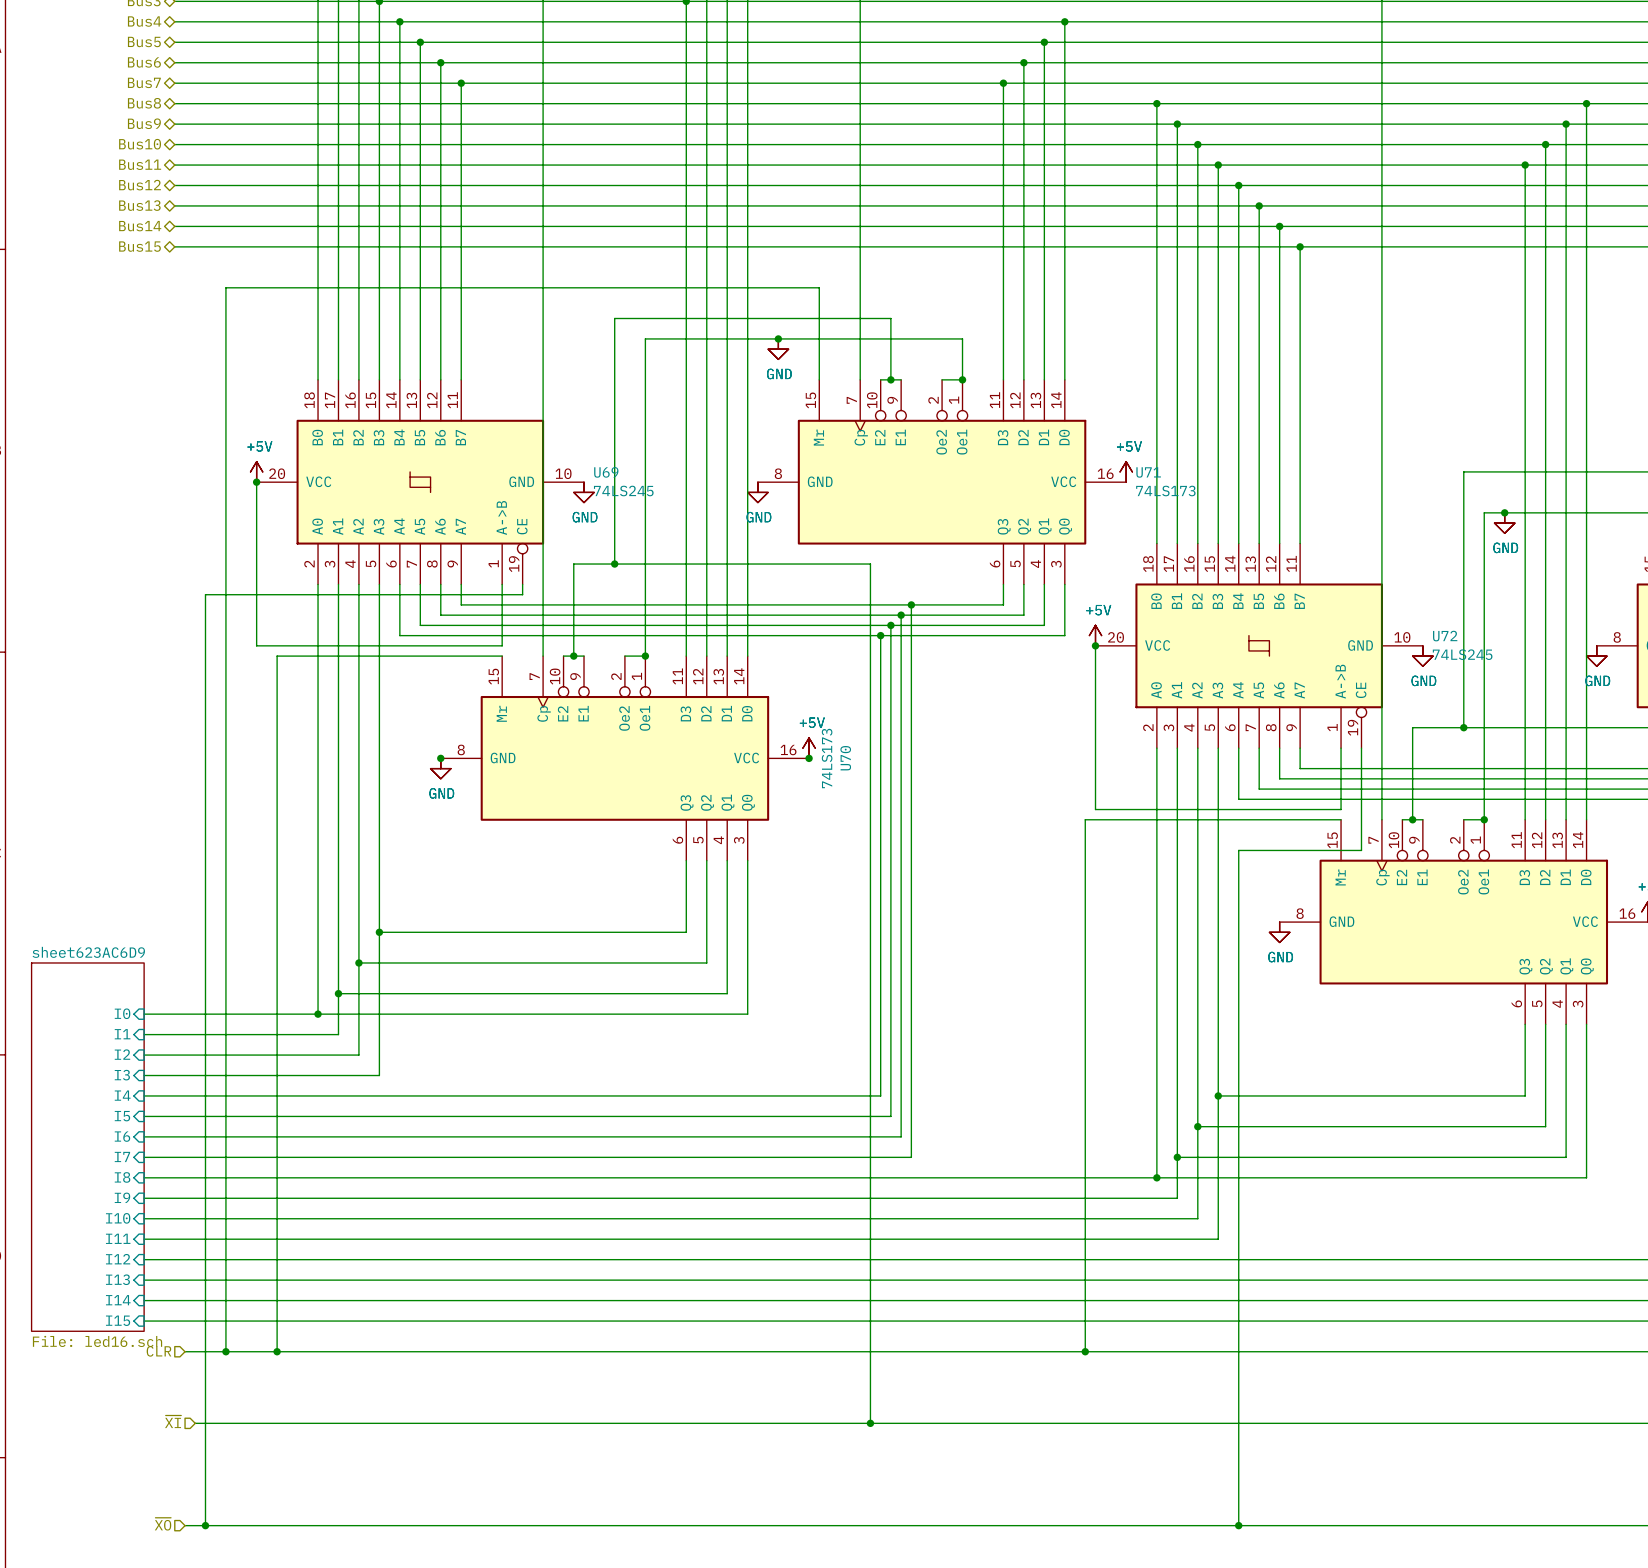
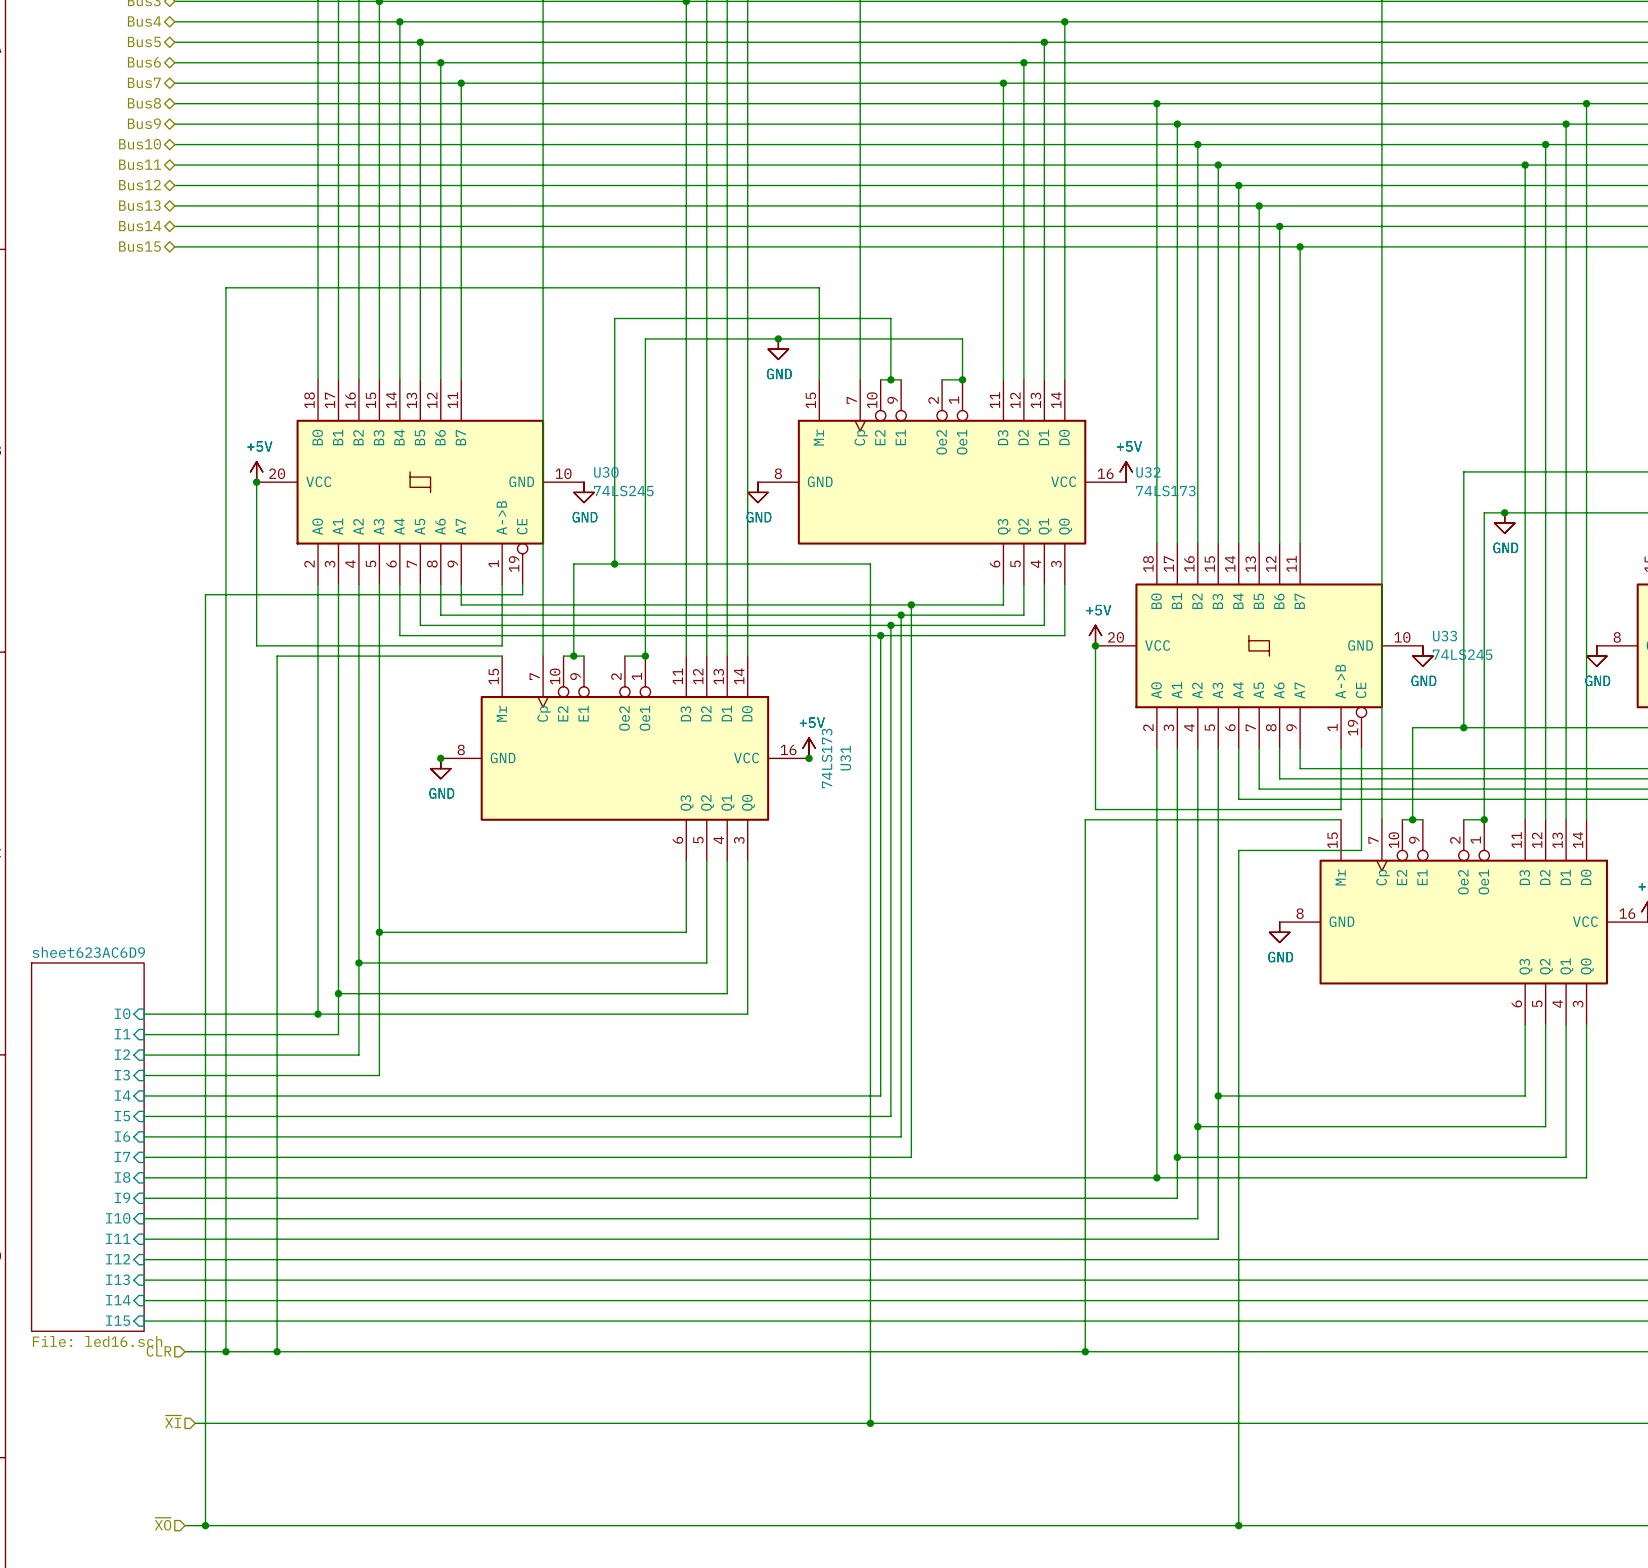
U69 name: U69 (606, 472) -> U30 (606, 472)
U71 name: U71 (1148, 472) -> U32 (1148, 472)
U72 name: U72 (1445, 636) -> U33 (1445, 636)
U70 name: U70 (845, 758) -> U31 (845, 758)

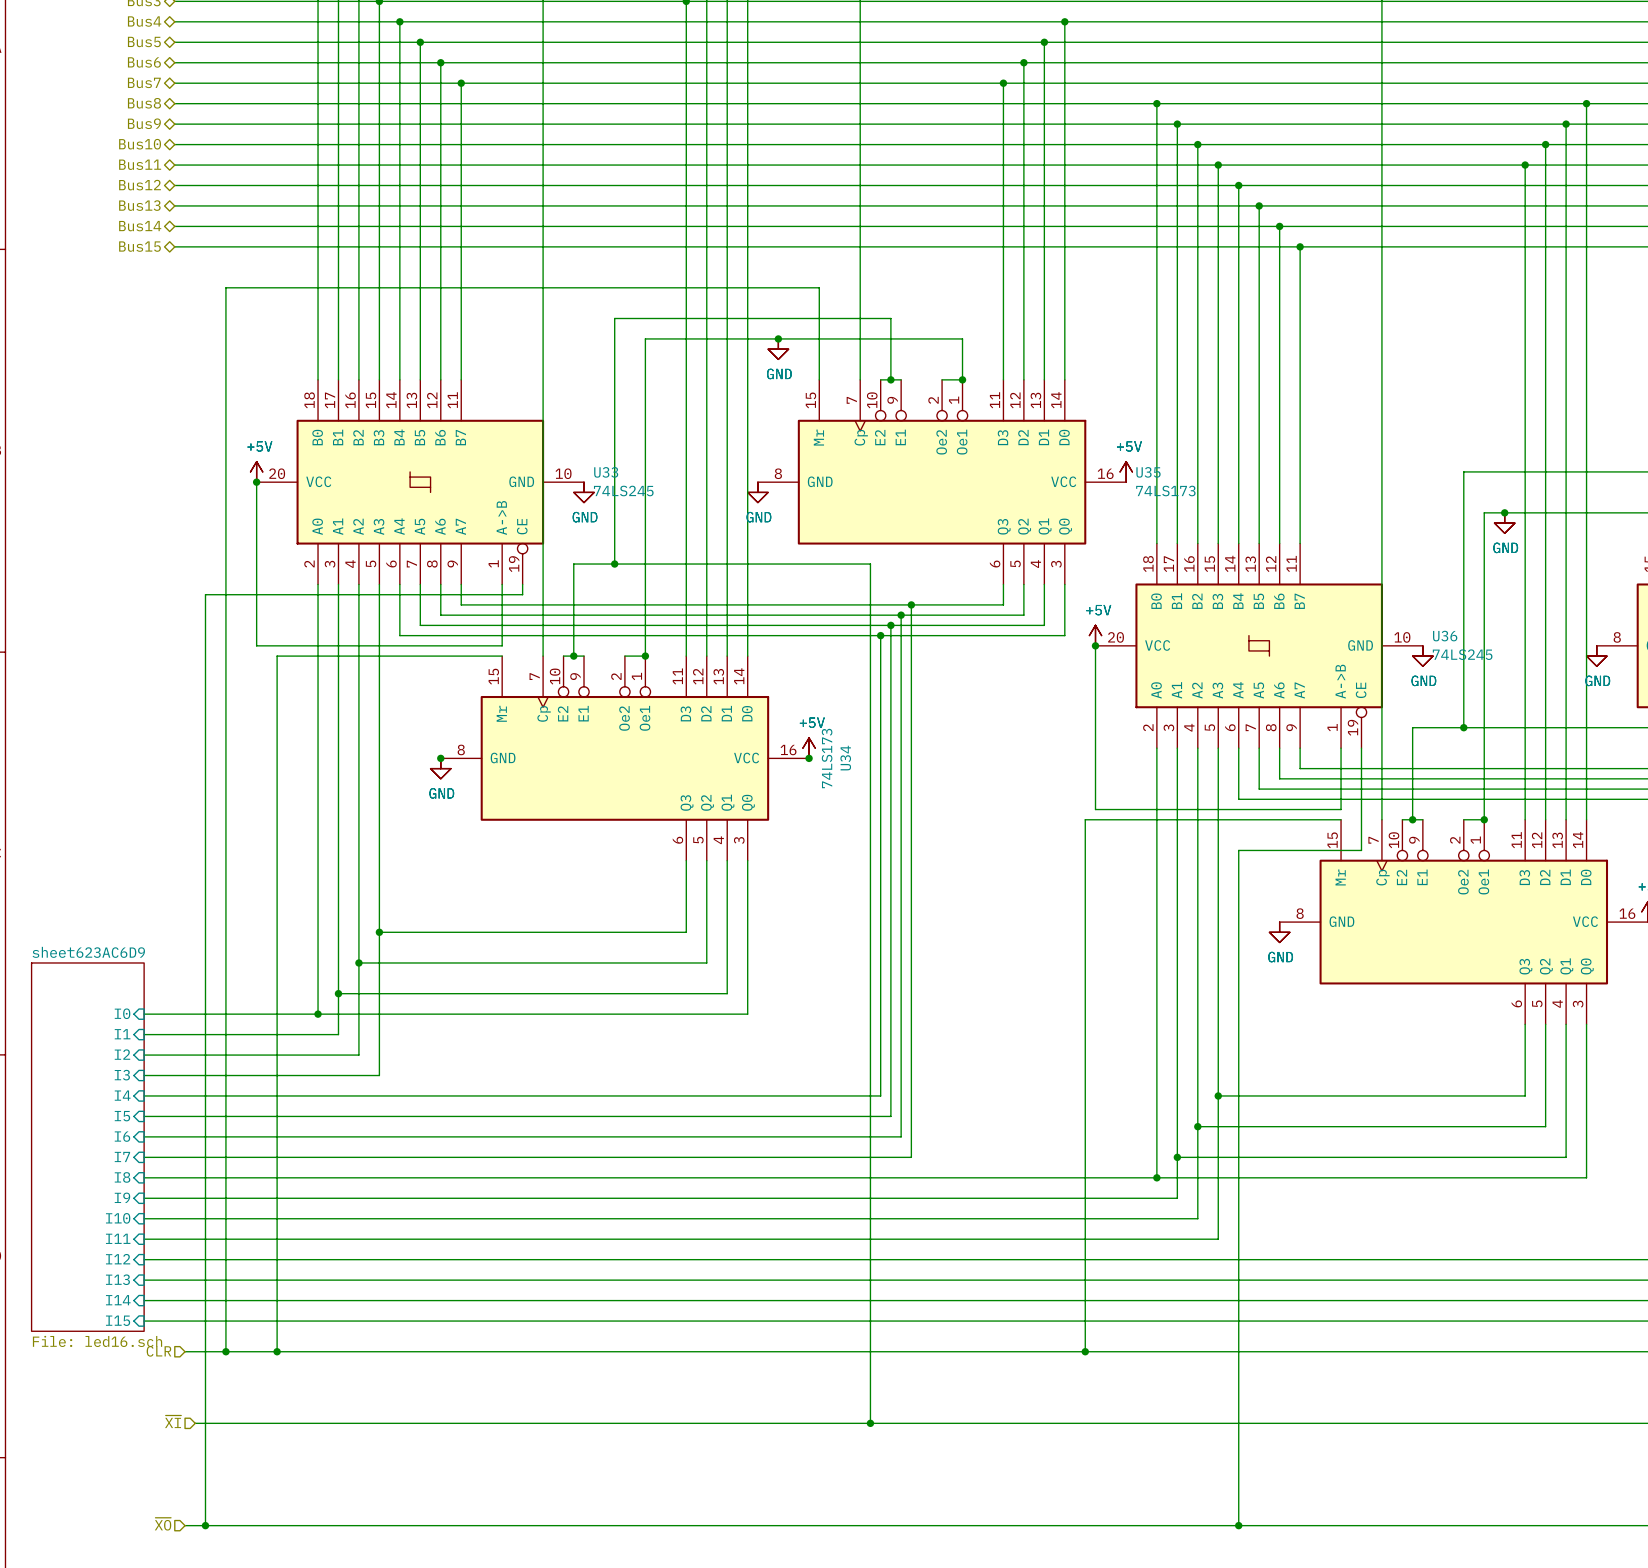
U30 name: U30 (606, 472) -> U33 (606, 472)
U32 name: U32 (1148, 472) -> U35 (1148, 472)
U33 name: U33 (1445, 636) -> U36 (1445, 636)
U31 name: U31 (845, 758) -> U34 (845, 758)

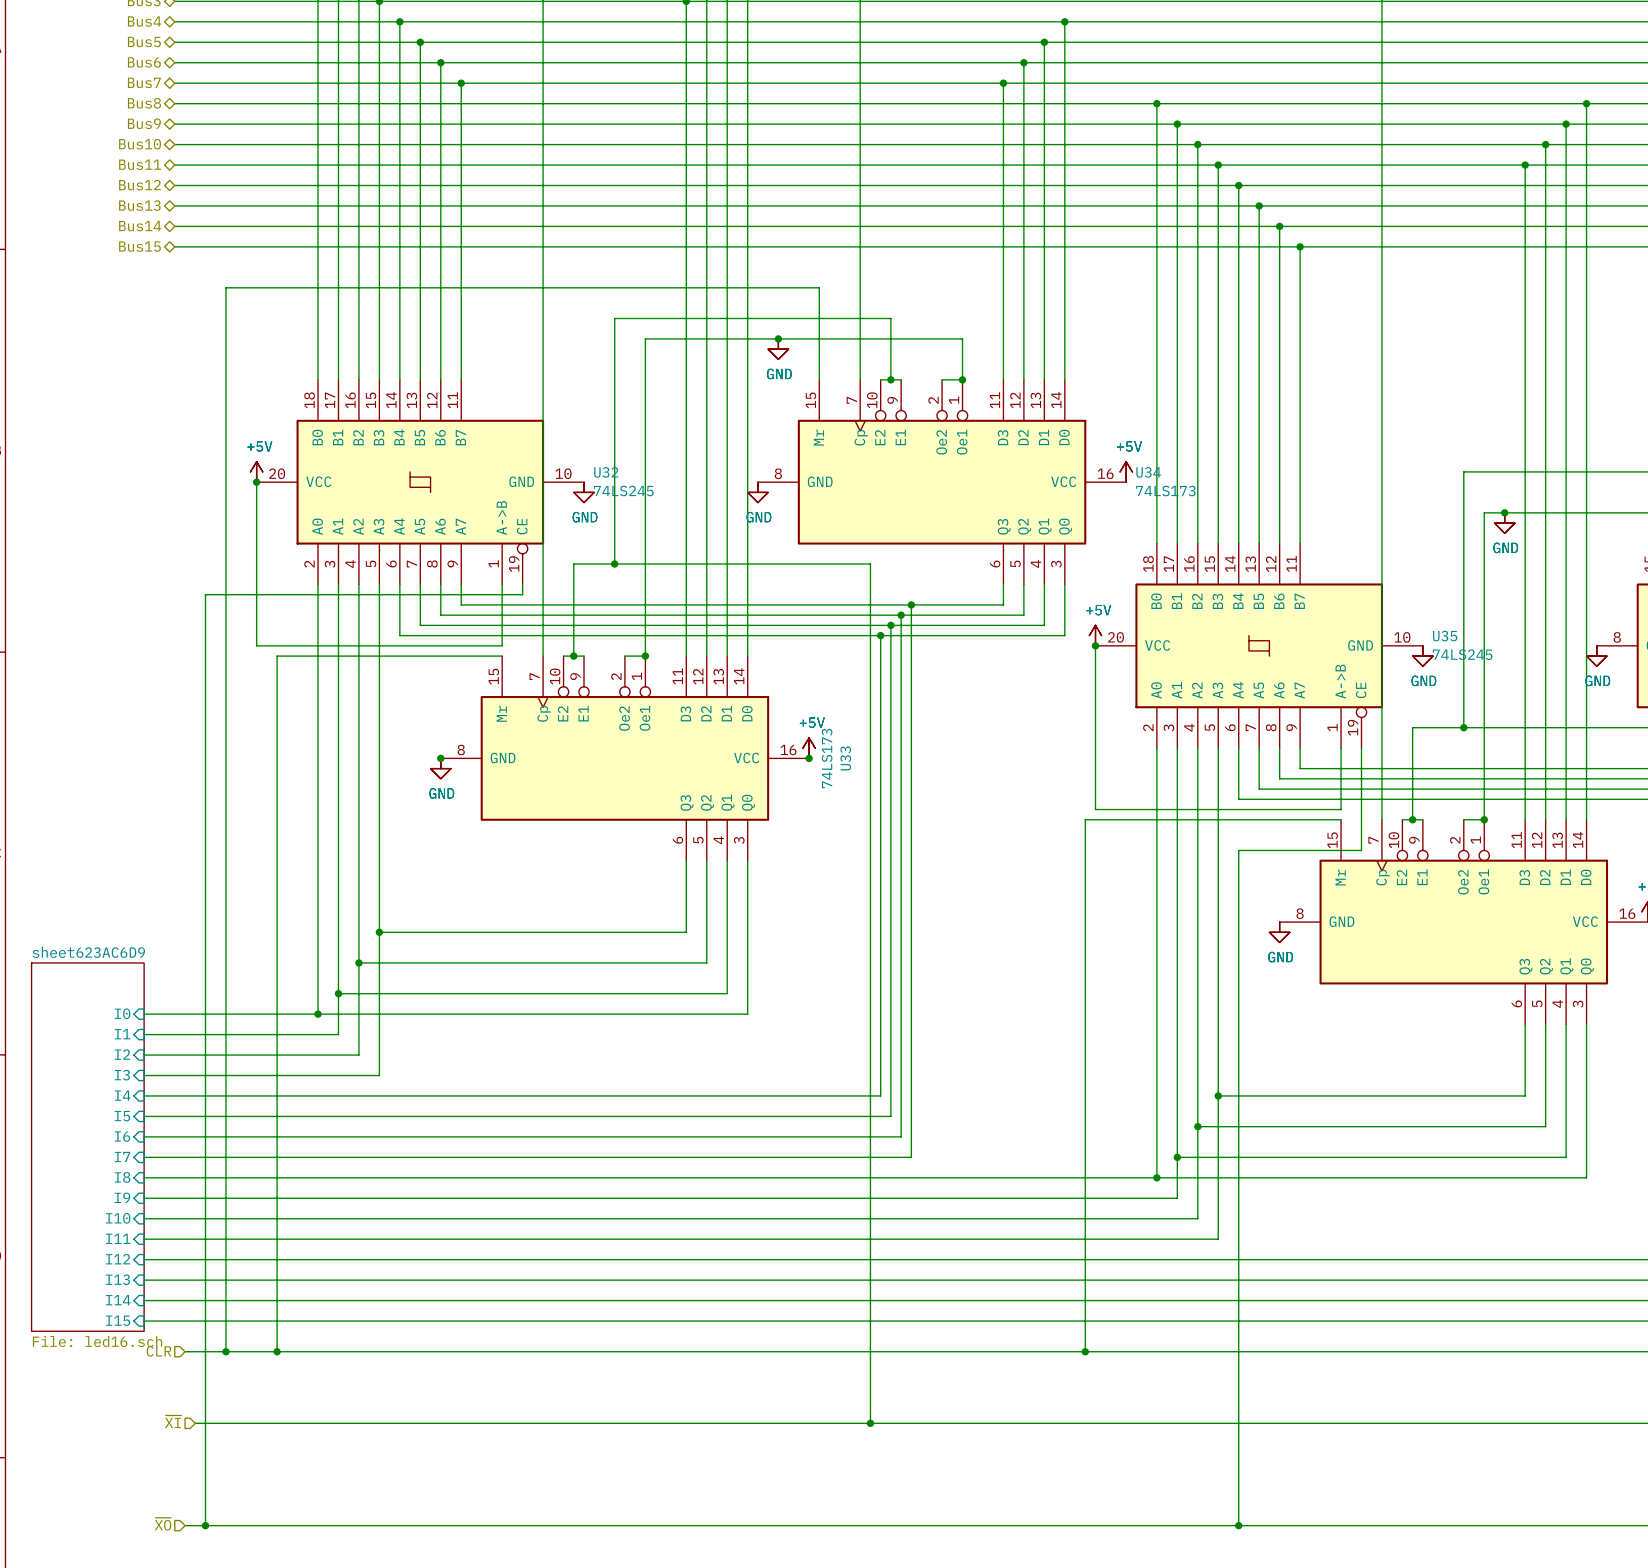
U33 name: U33 (606, 472) -> U32 (606, 472)
U35 name: U35 (1148, 472) -> U34 (1148, 472)
U36 name: U36 (1445, 636) -> U35 (1445, 636)
U34 name: U34 (845, 758) -> U33 (845, 758)

